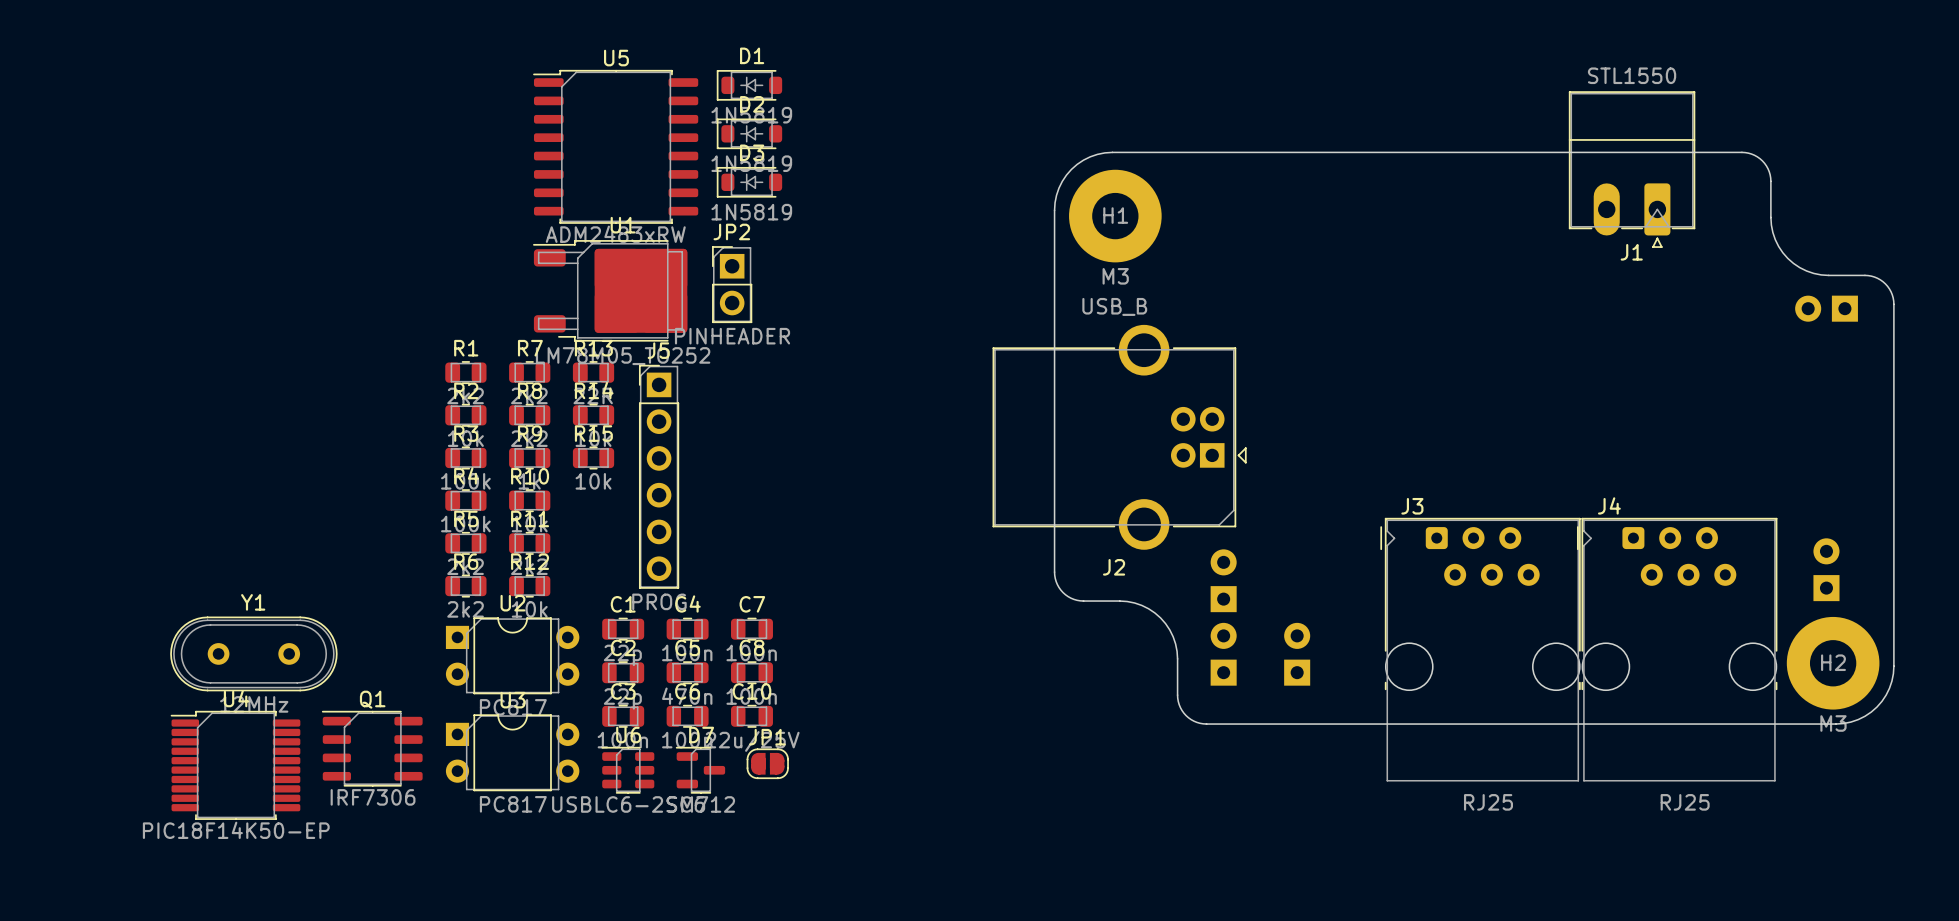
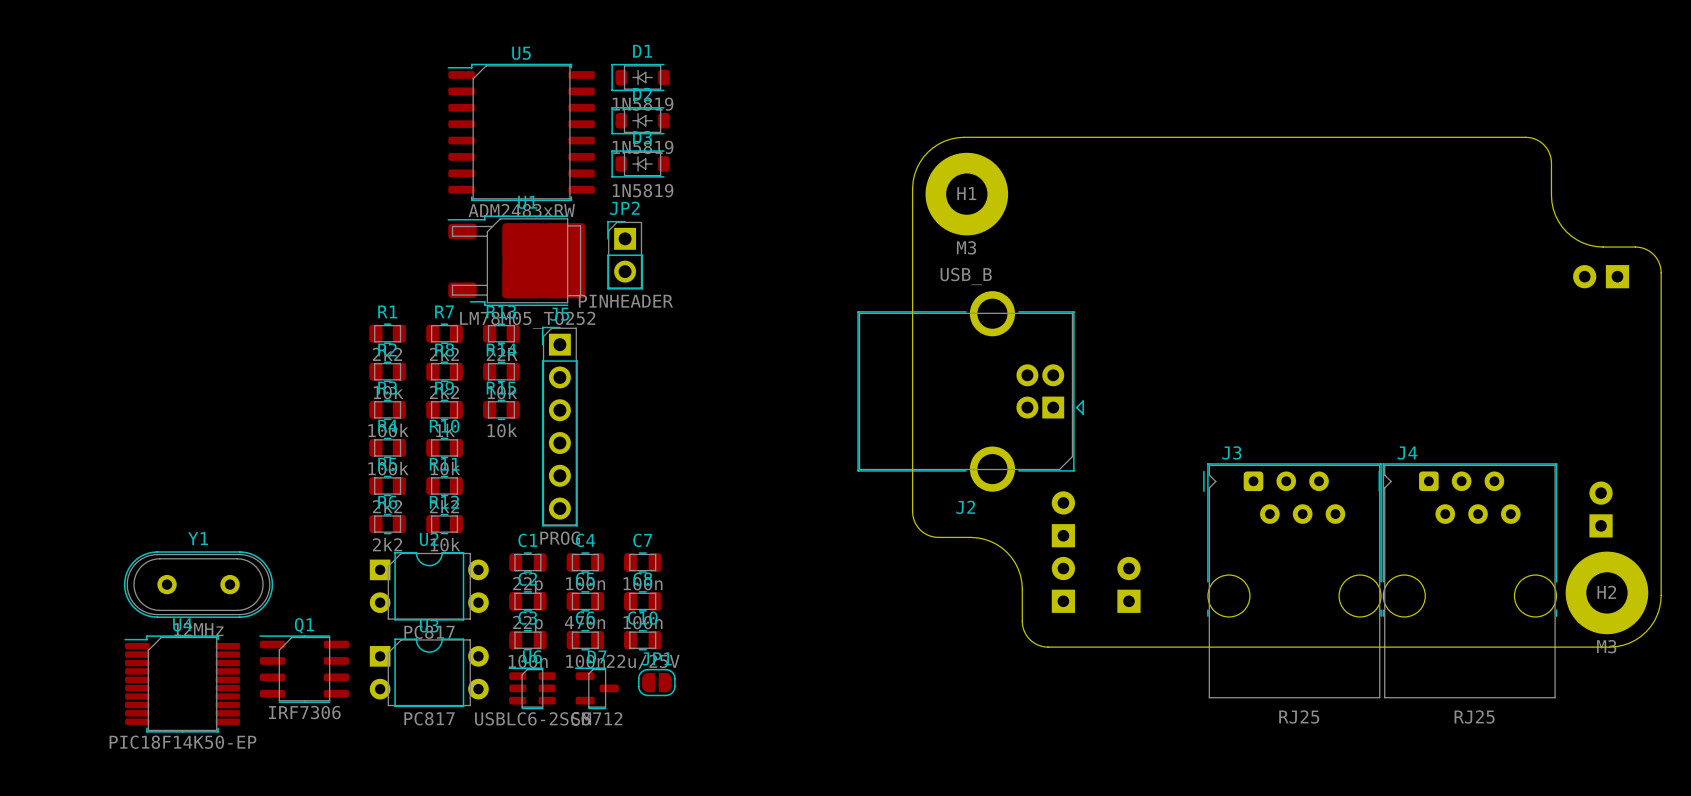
J1: STL1550 (1632, 169) -> none

